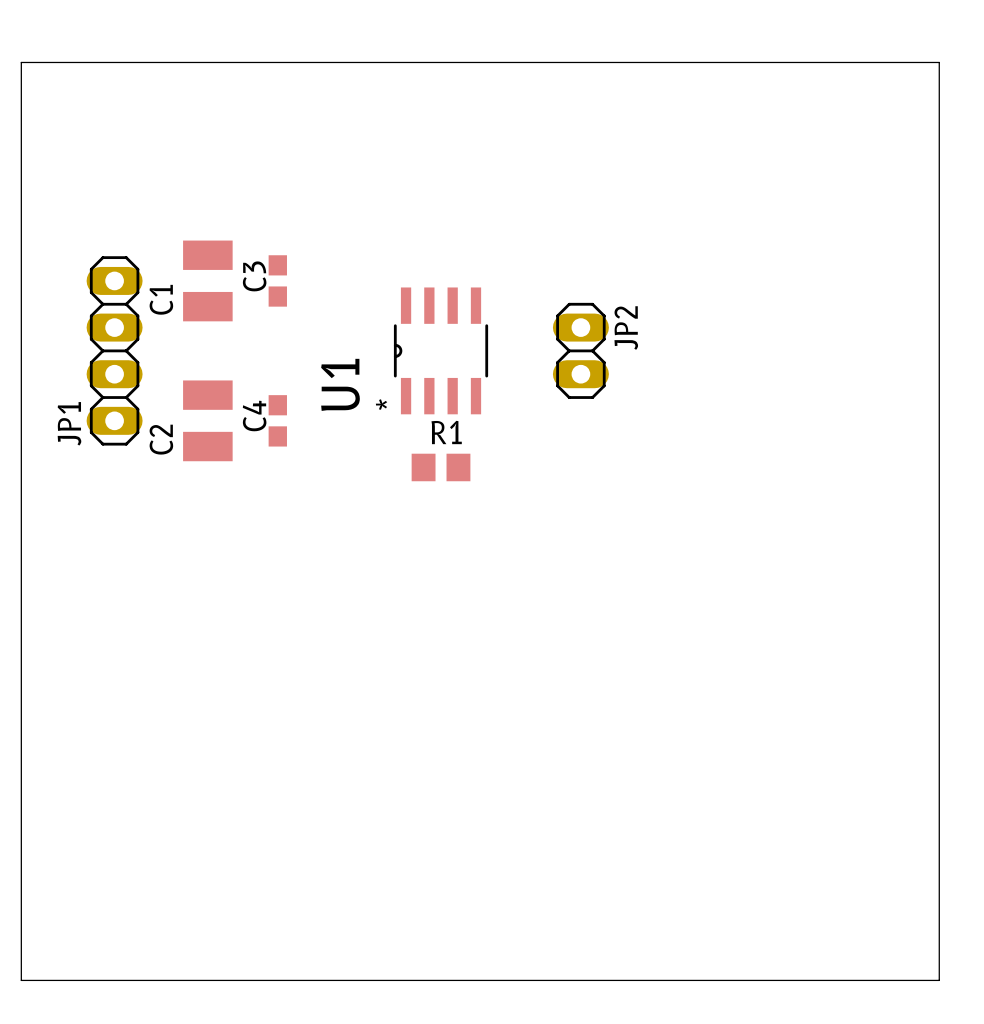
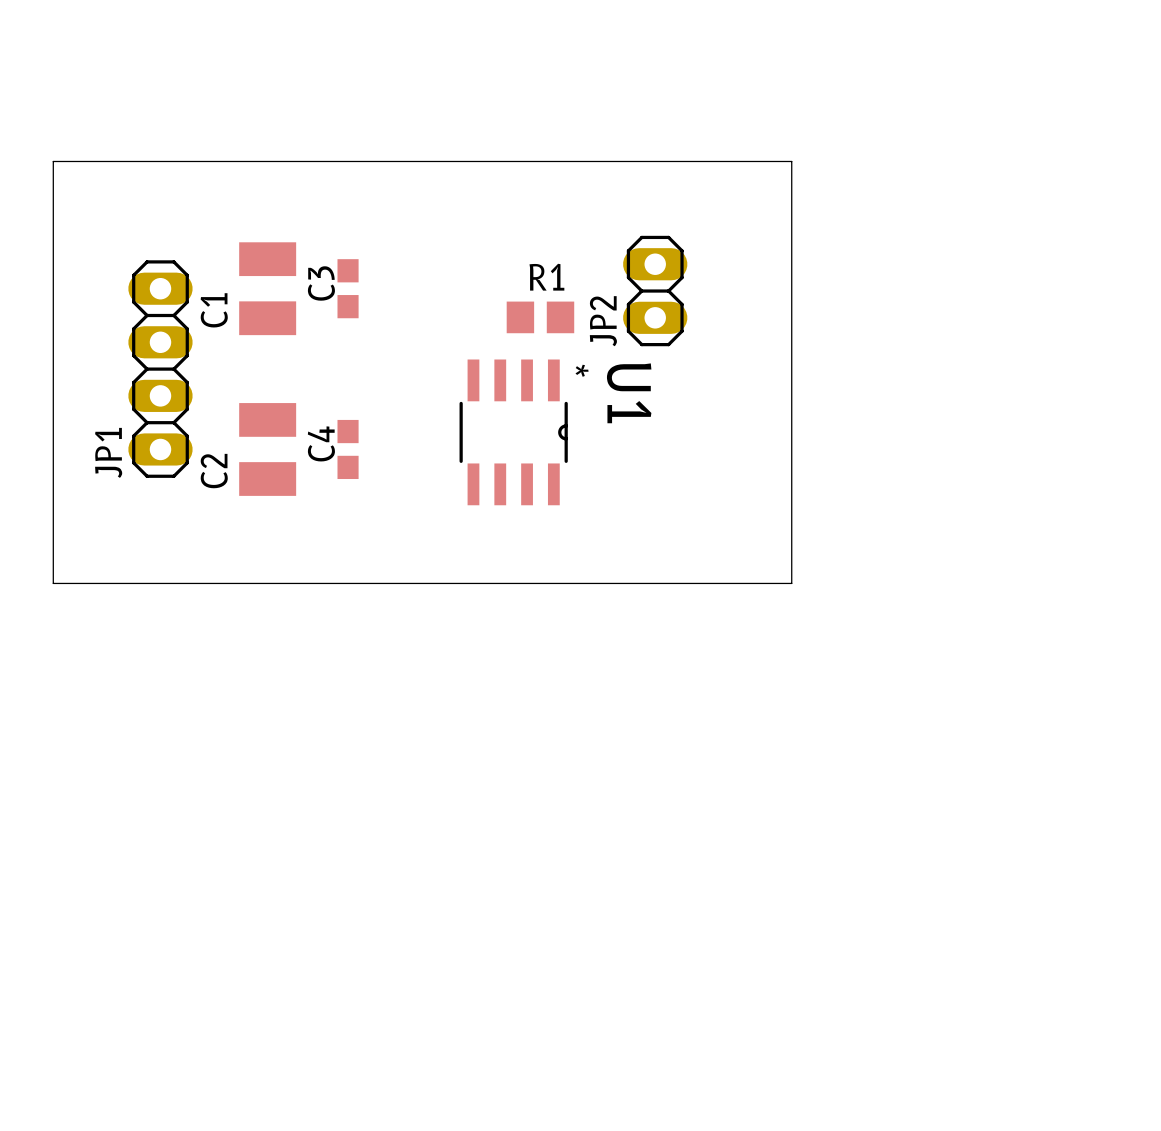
board edge: (21, 170) (21, 62) (939, 62) (939, 980) (21, 980) (21, 537) -> (53, 161) (791, 161) (791, 583) (53, 583)
JP2 name position: JP2 (626, 328) -> JP2 (603, 321)
U1 rotation: 0° (441, 350) -> 180° (513, 432)
JP2 position: (580, 350) -> (655, 291)
R1 position: (441, 467) -> (540, 317)

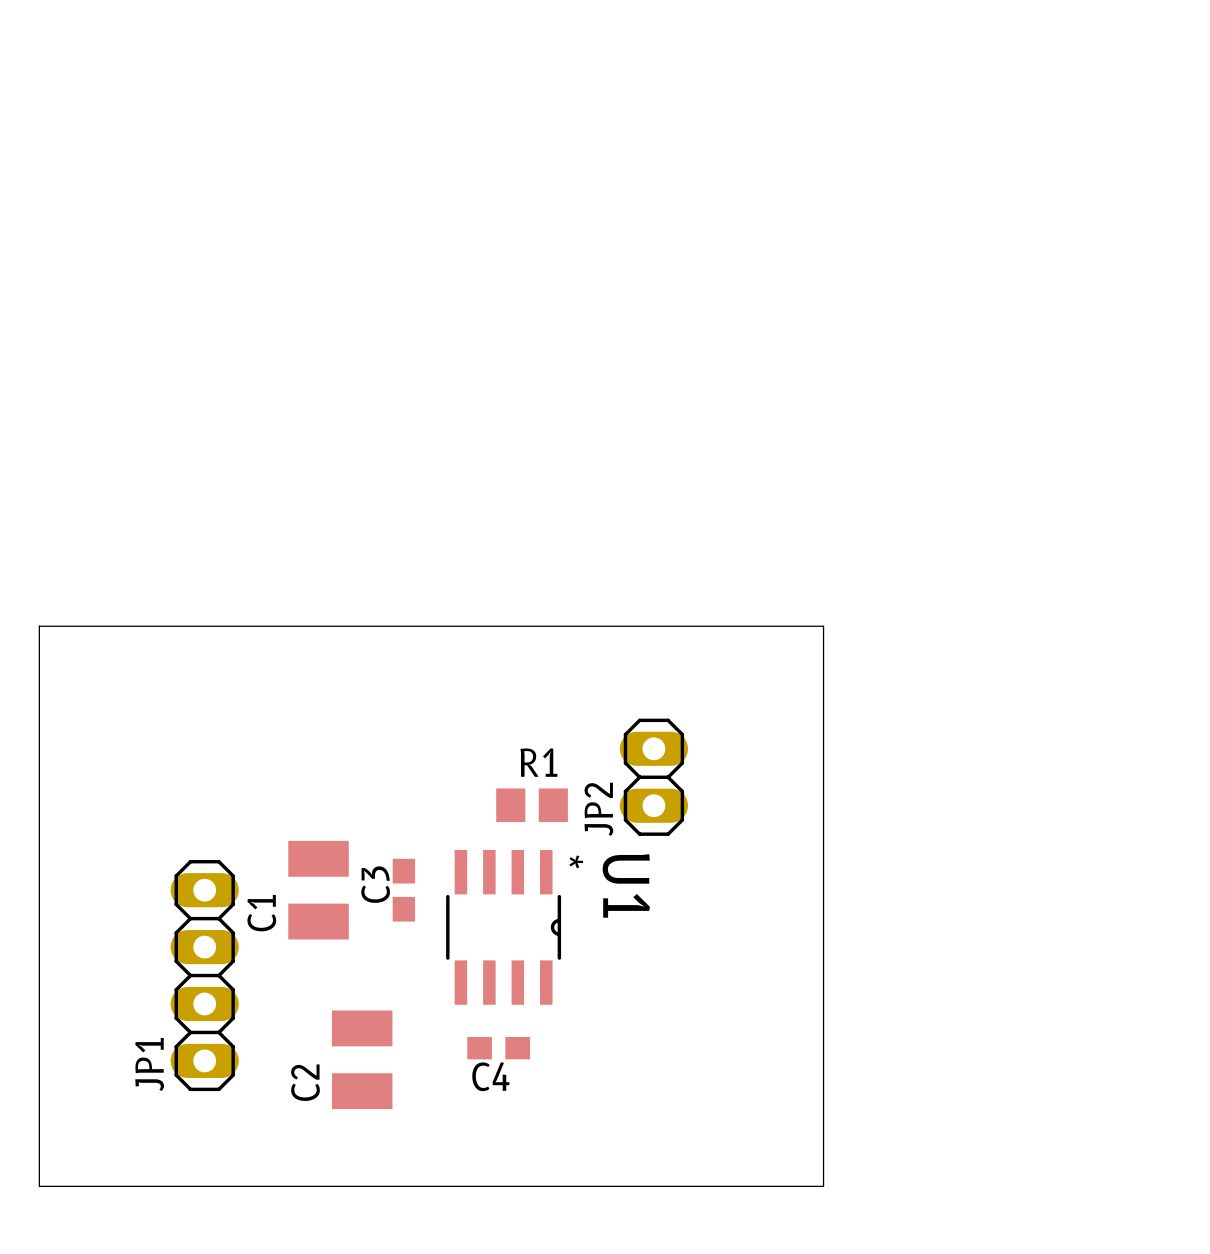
C1 position: (267, 288) -> (318, 890)
C3 position: (348, 288) -> (403, 890)
JP2 position: (655, 291) -> (653, 777)
R1 position: (540, 317) -> (532, 805)
JP1 position: (160, 369) -> (204, 975)
U1 position: (513, 432) -> (503, 927)
C4 name position: C4 (321, 443) -> C4 (490, 1076)
C2 position: (267, 449) -> (362, 1059)
C4 rotation: 0° (348, 449) -> 90° clockwise (498, 1048)
C4 position: (348, 449) -> (498, 1048)
board edge: (53, 565) (53, 161) (791, 161) (791, 565) -> (39, 626) (823, 626)
board edge: (53, 583) (791, 583) -> (39, 645) (39, 1186) (823, 1186) (823, 645)

